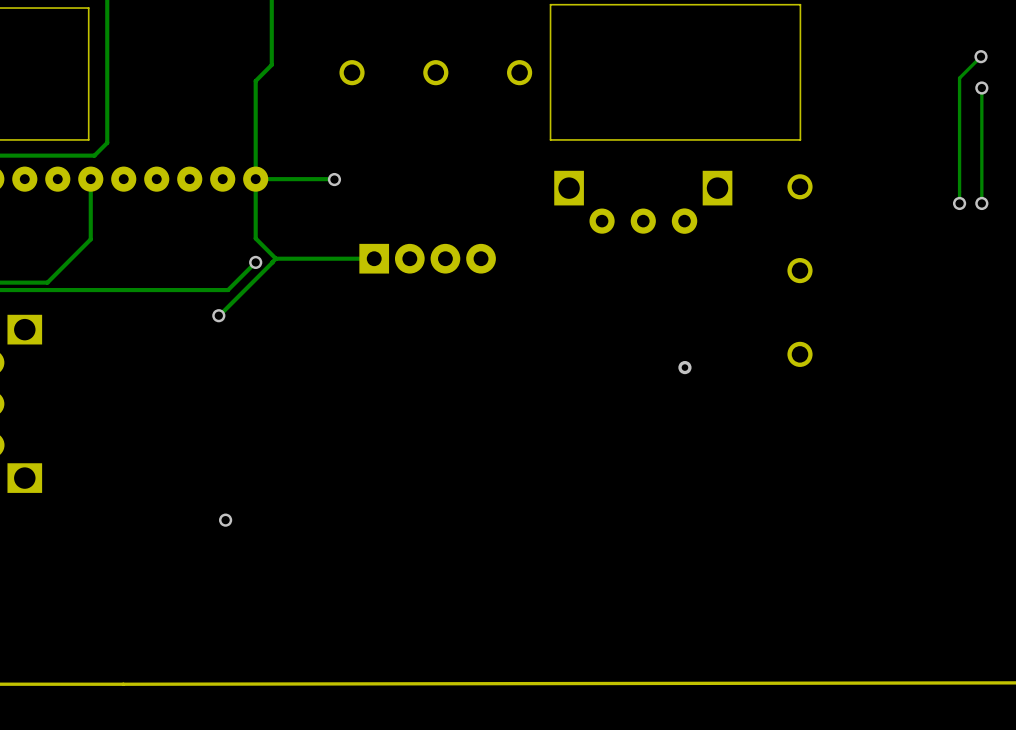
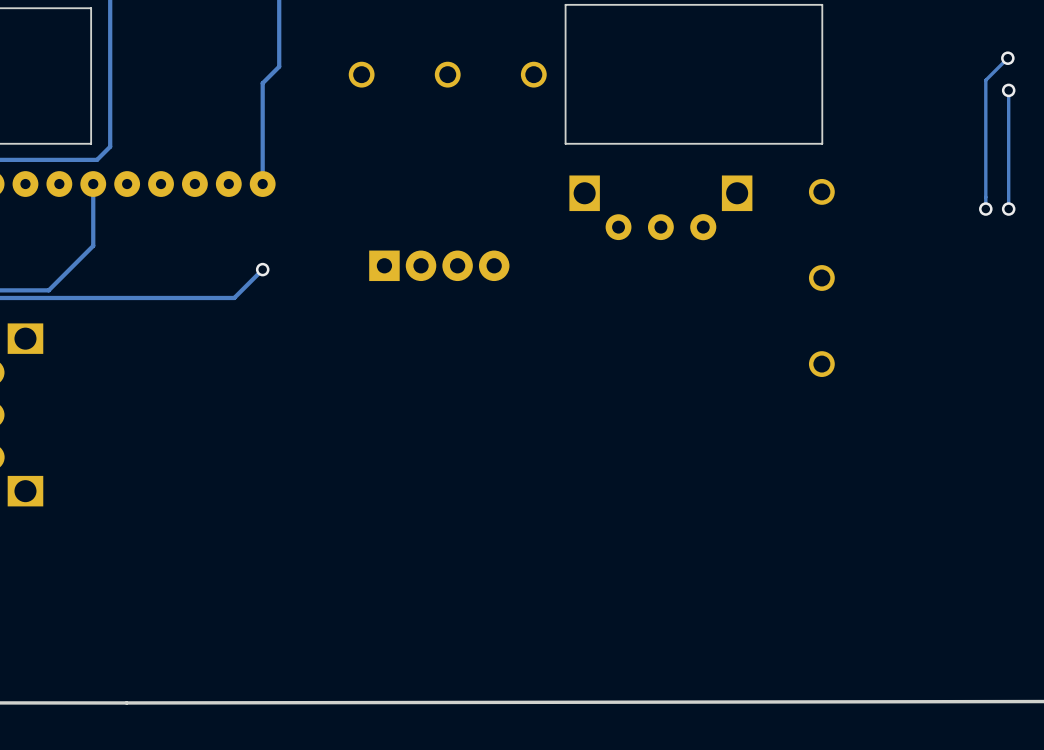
track: (334, 179) (255, 179) (255, 238) (275, 258) -> none
via: (334, 179) -> none
track: (275, 258) (218, 315) -> none
track: (374, 258) (275, 258) -> none
via: (218, 315) -> none
via: (684, 367) -> none
via: (225, 520) -> none

